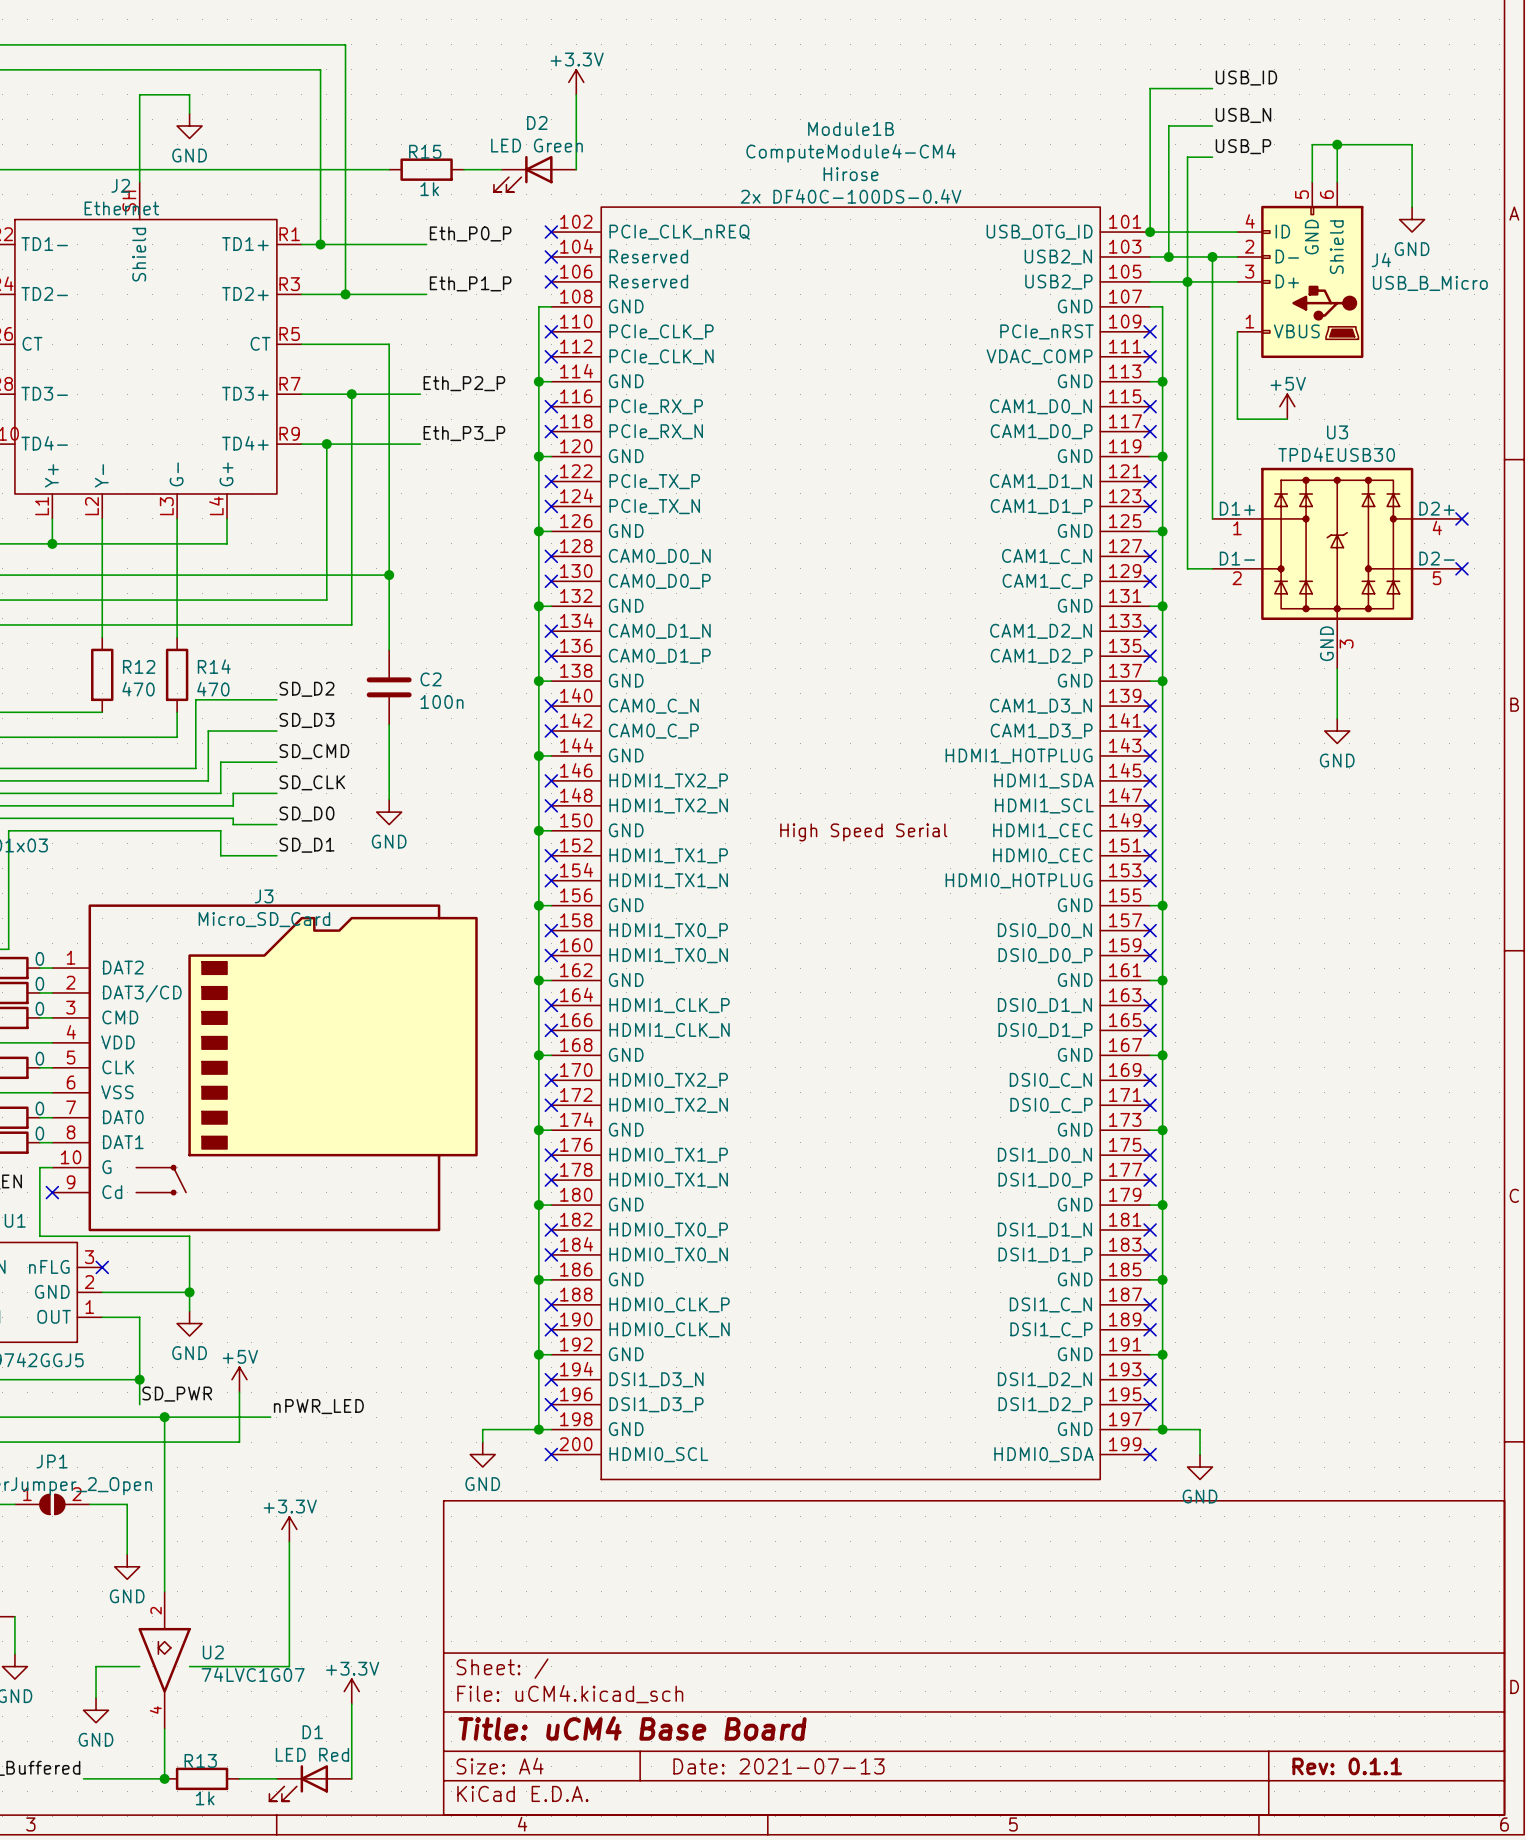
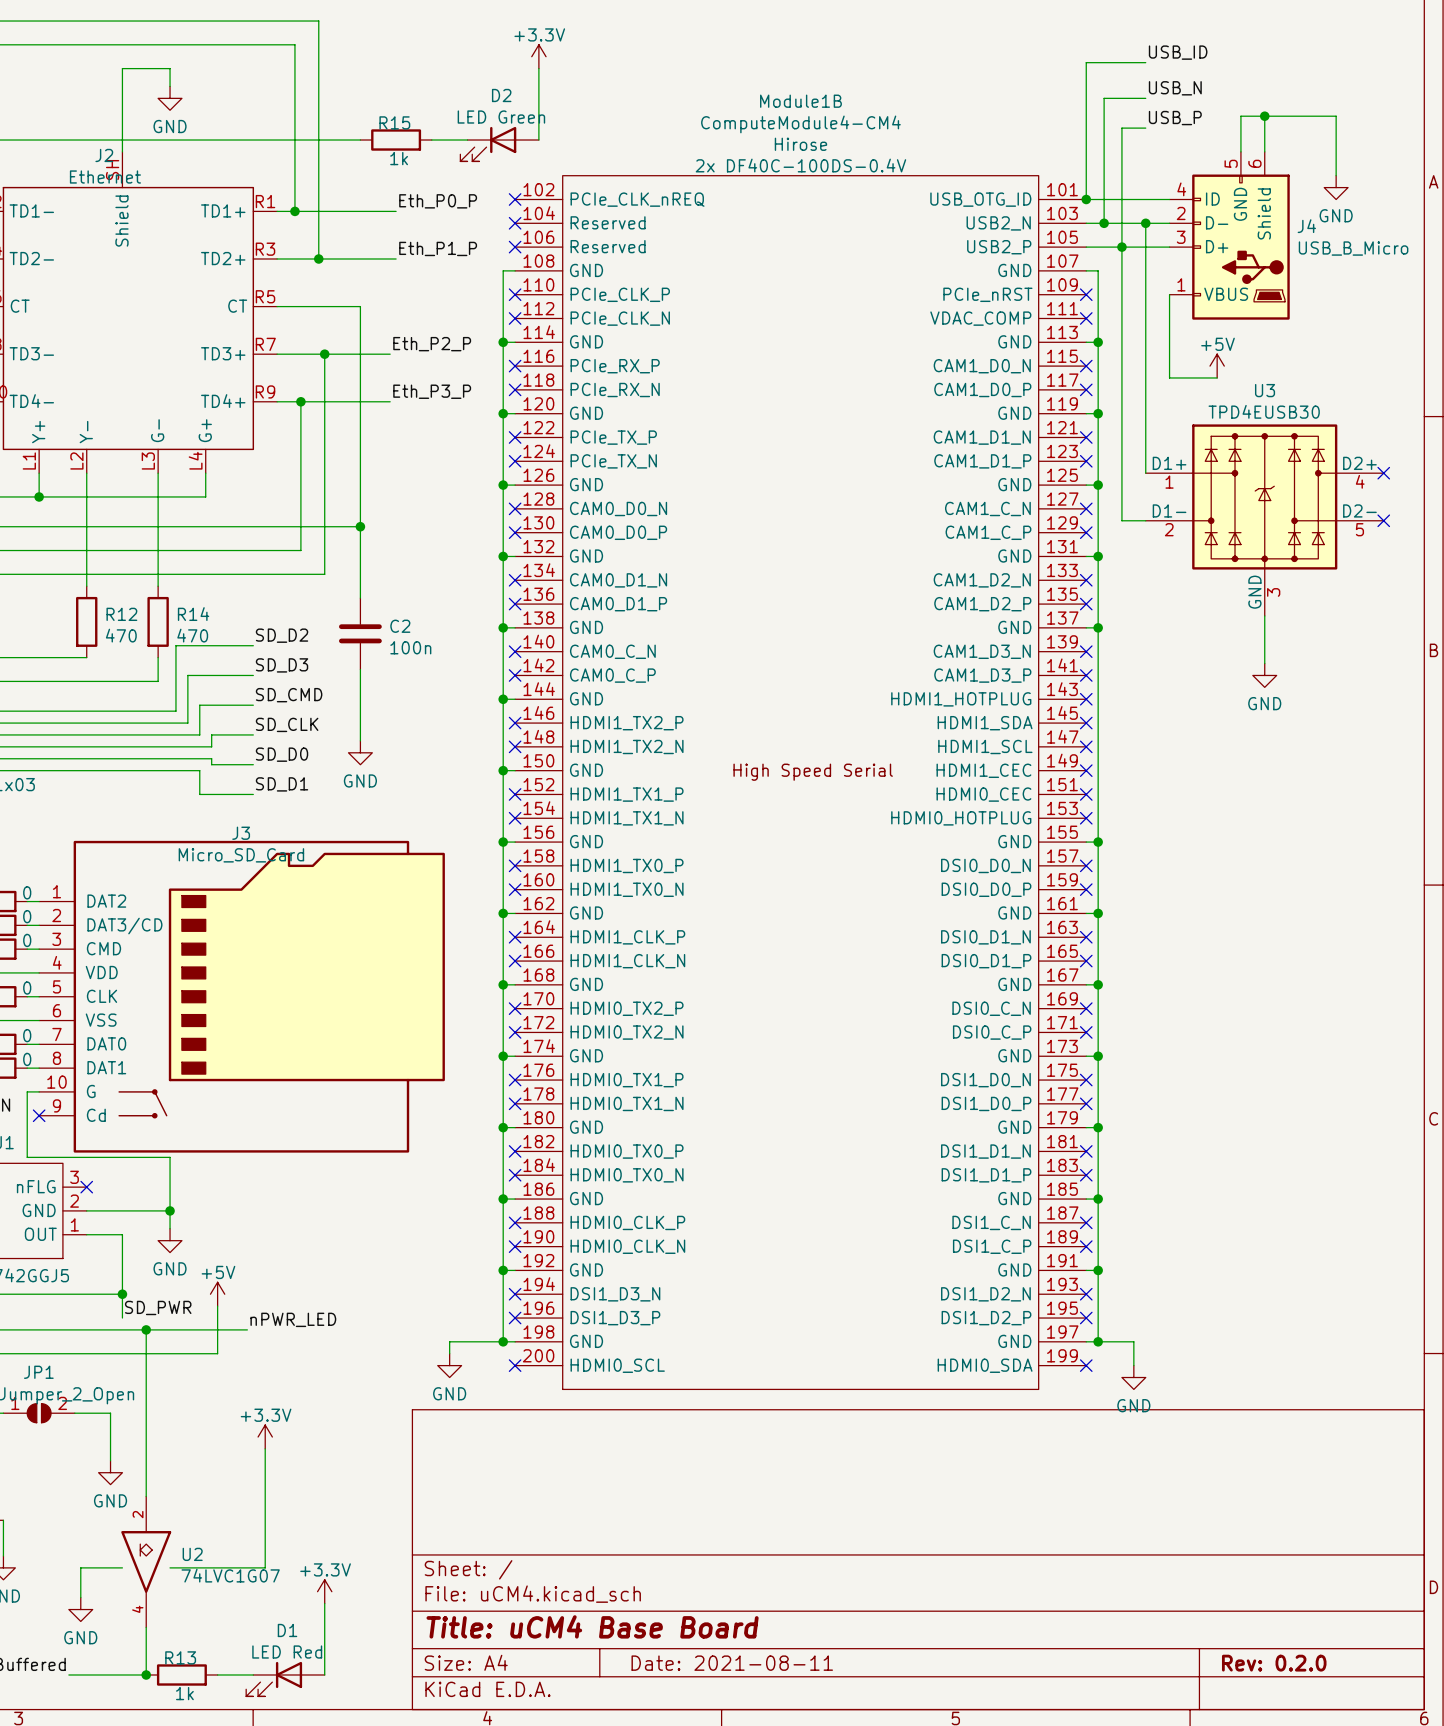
title block: Date: 2021-07-13 (778, 1766) -> Date: 2021-08-11 (732, 1663)
title block: Rev: 0.1.1 (1347, 1766) -> Rev: 0.2.0 (1274, 1663)

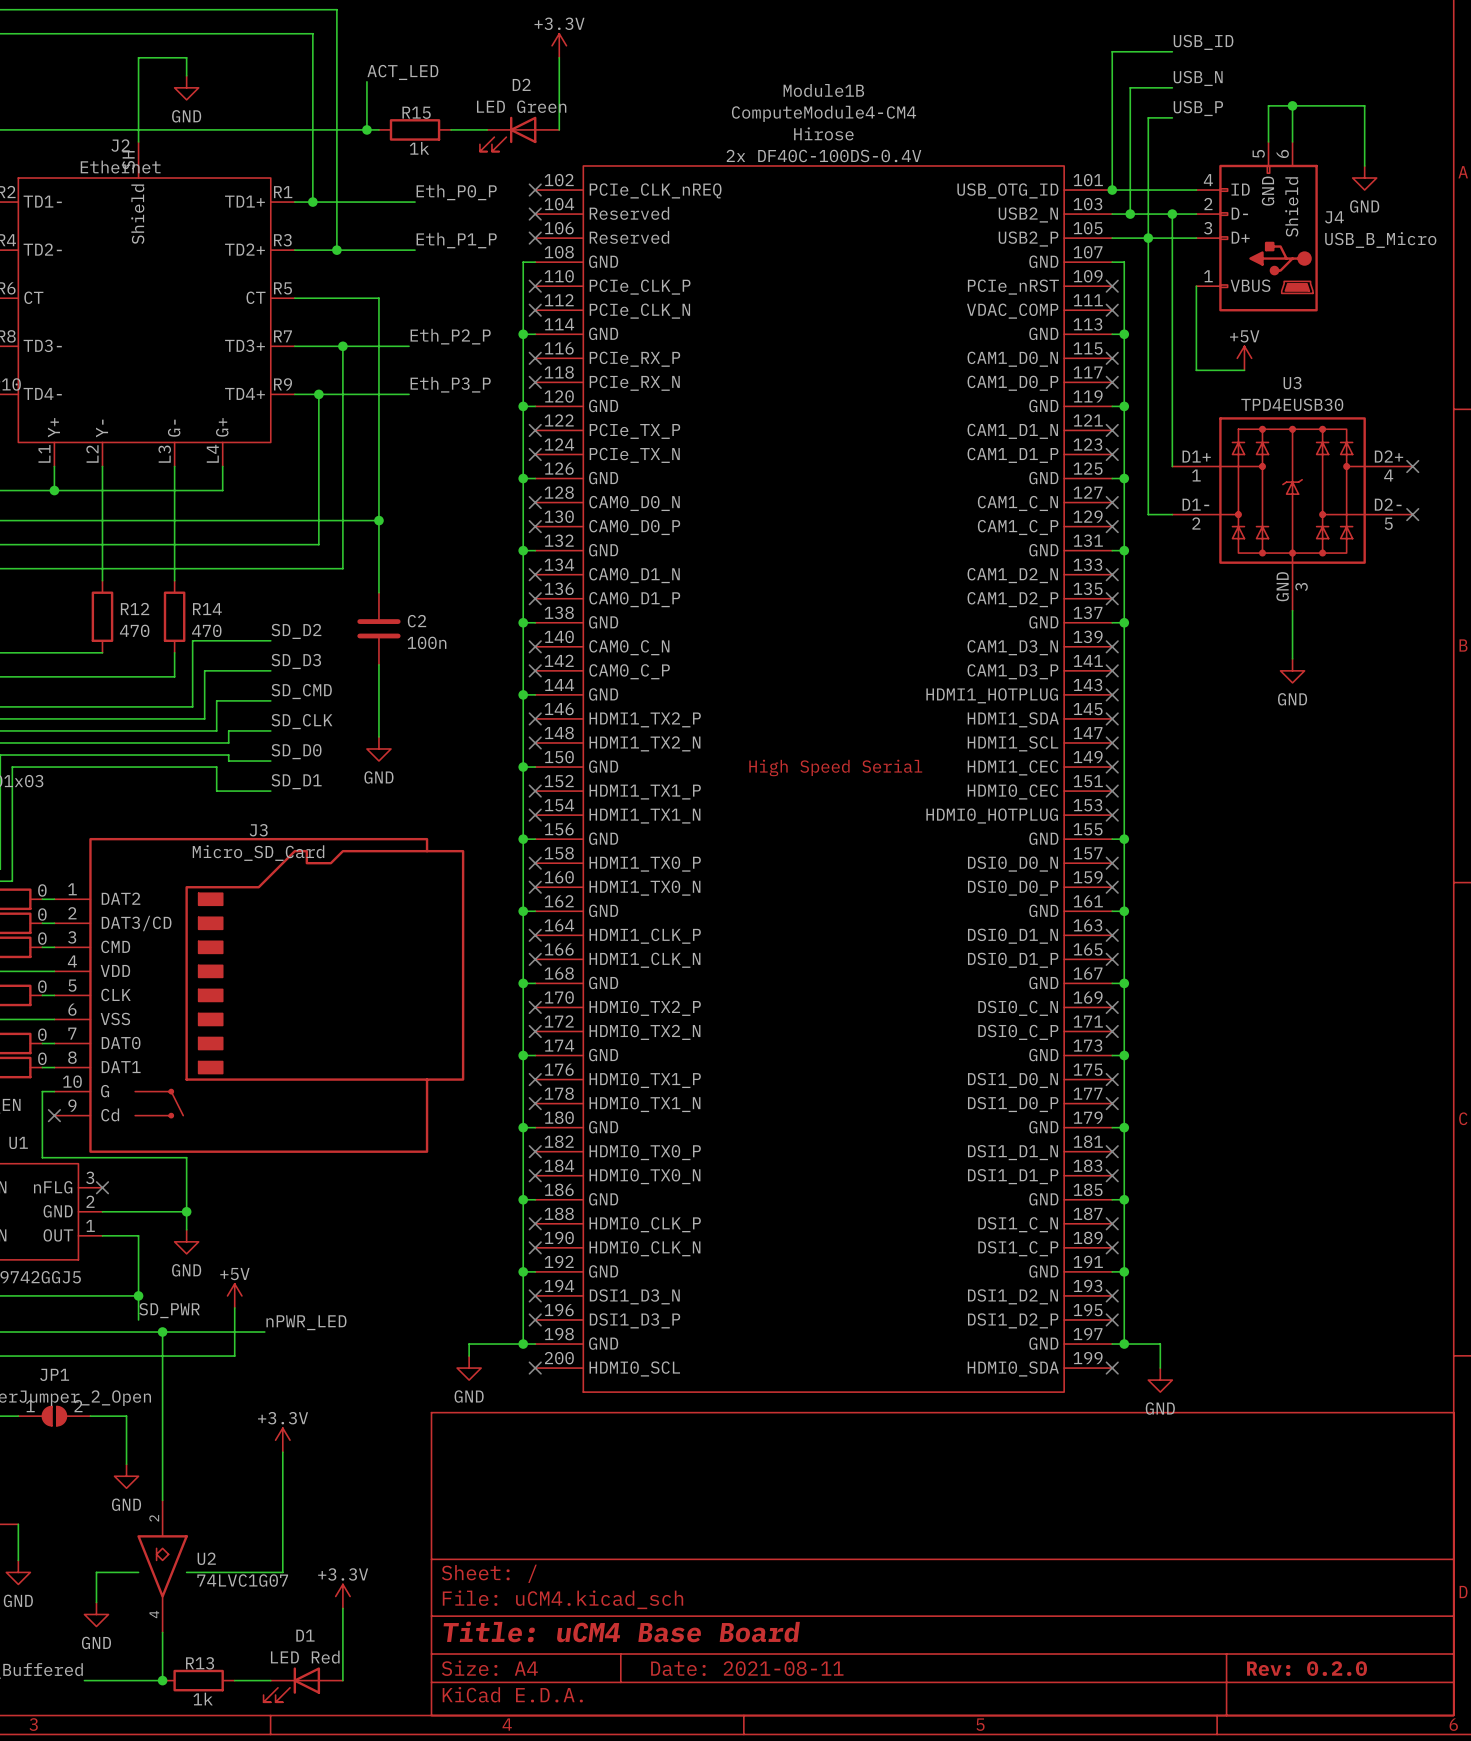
label: none -> ACT_LED (402, 72)
wire: none -> (366, 81) (366, 129)
junction: none -> (366, 129)

